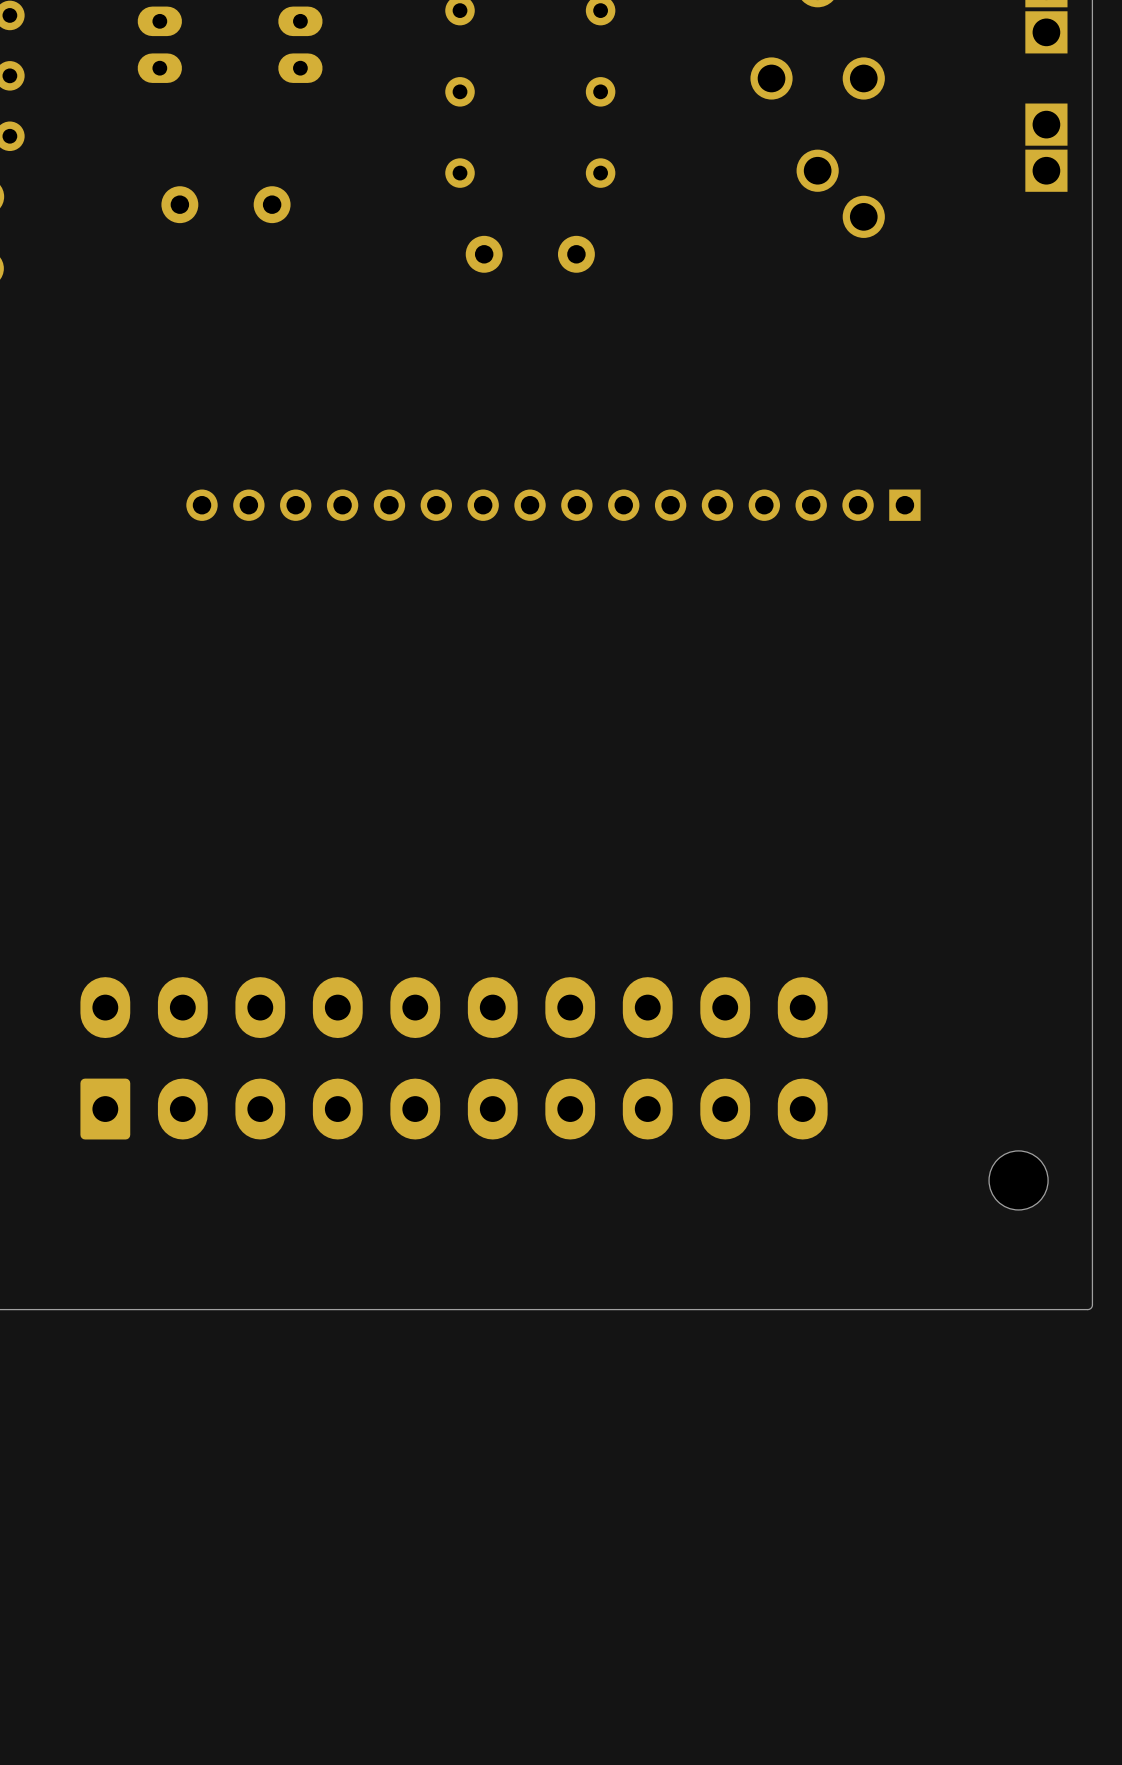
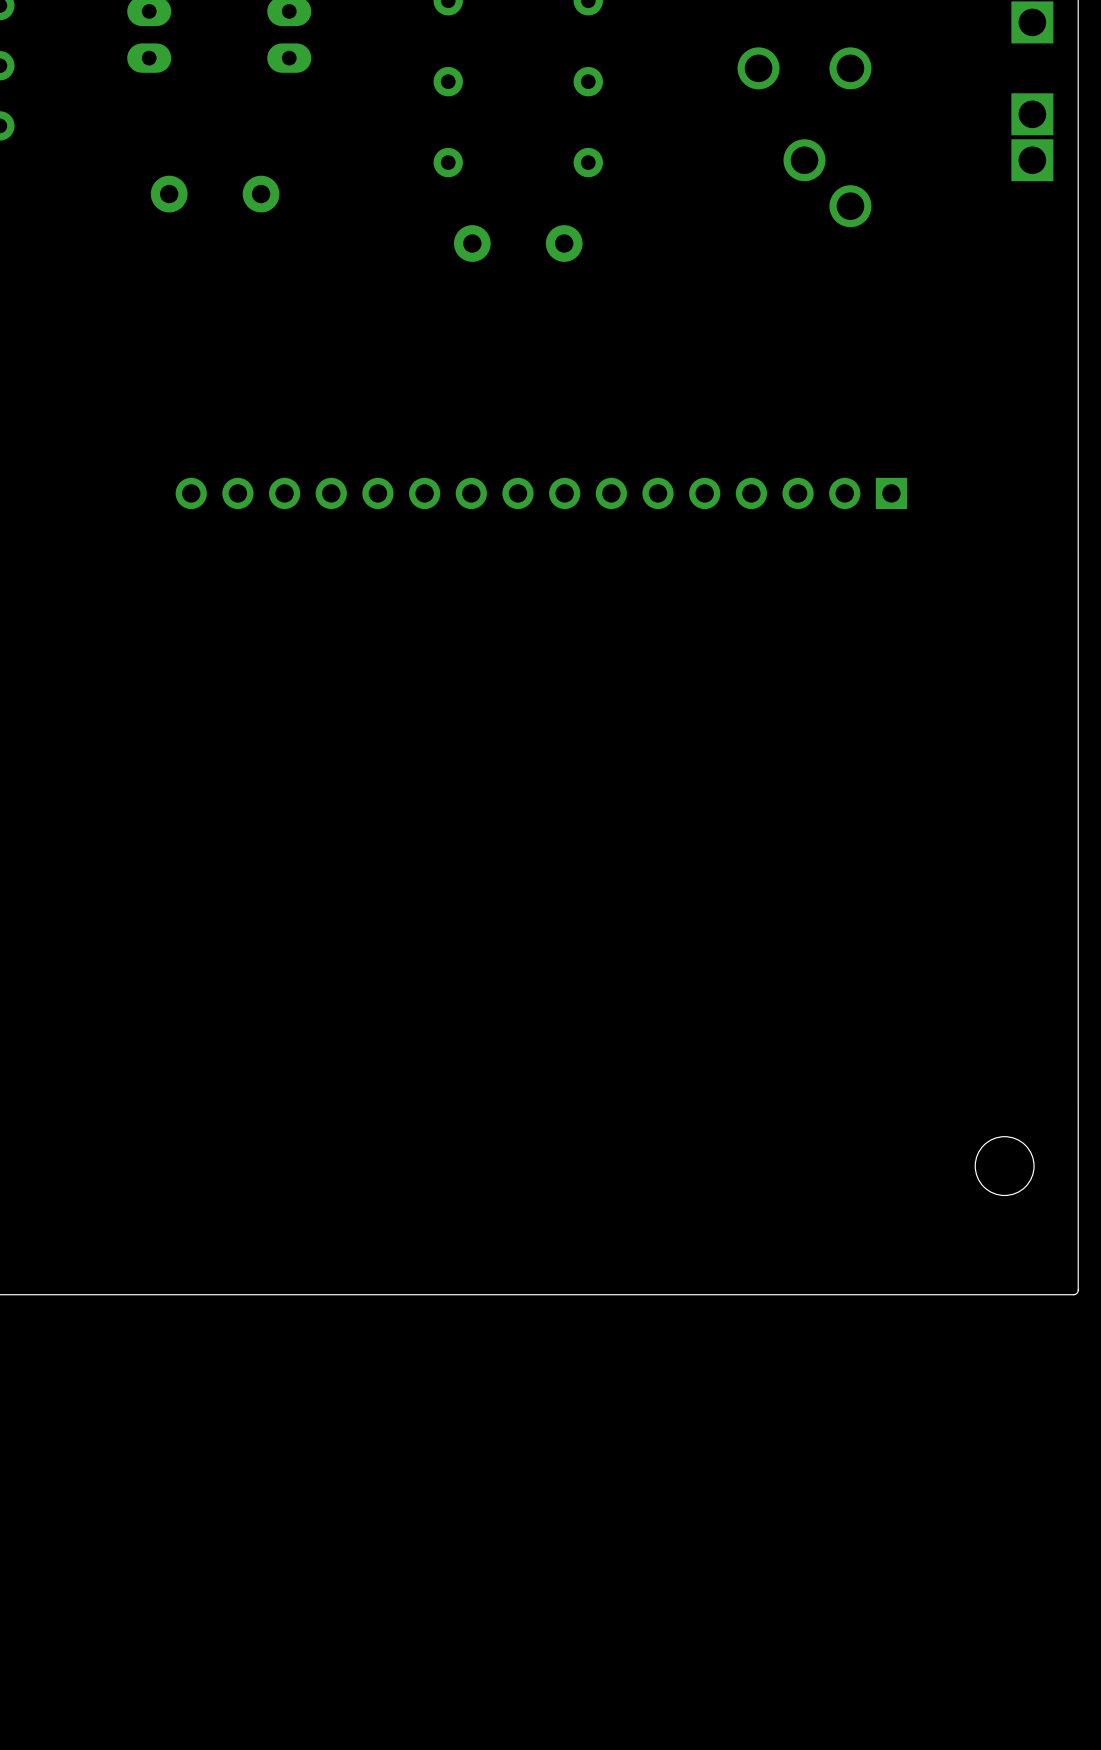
part: (454, 1058) -> none

